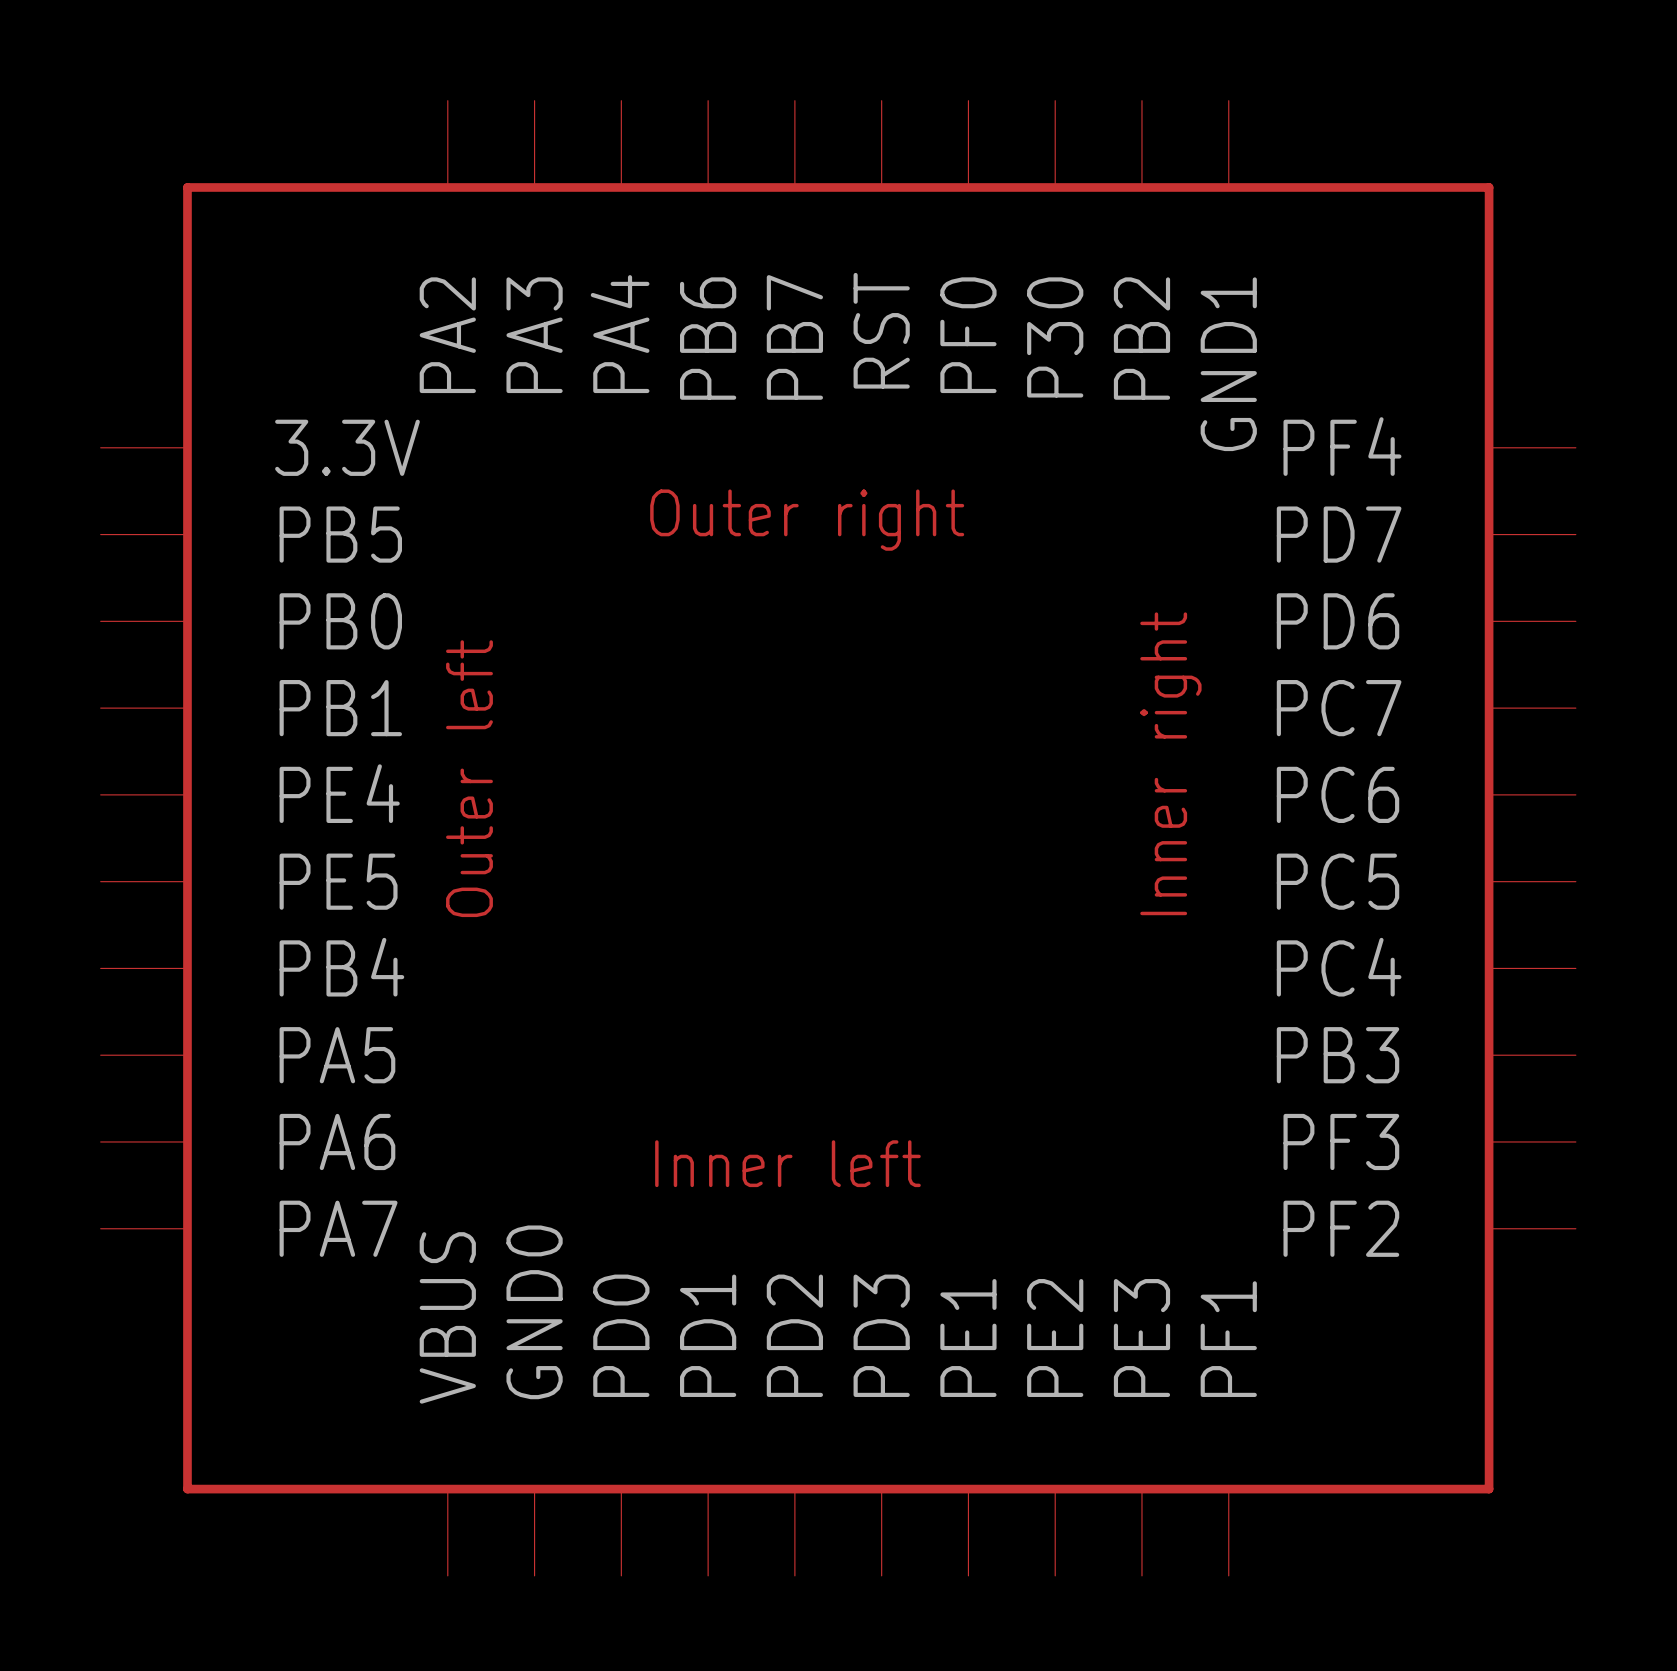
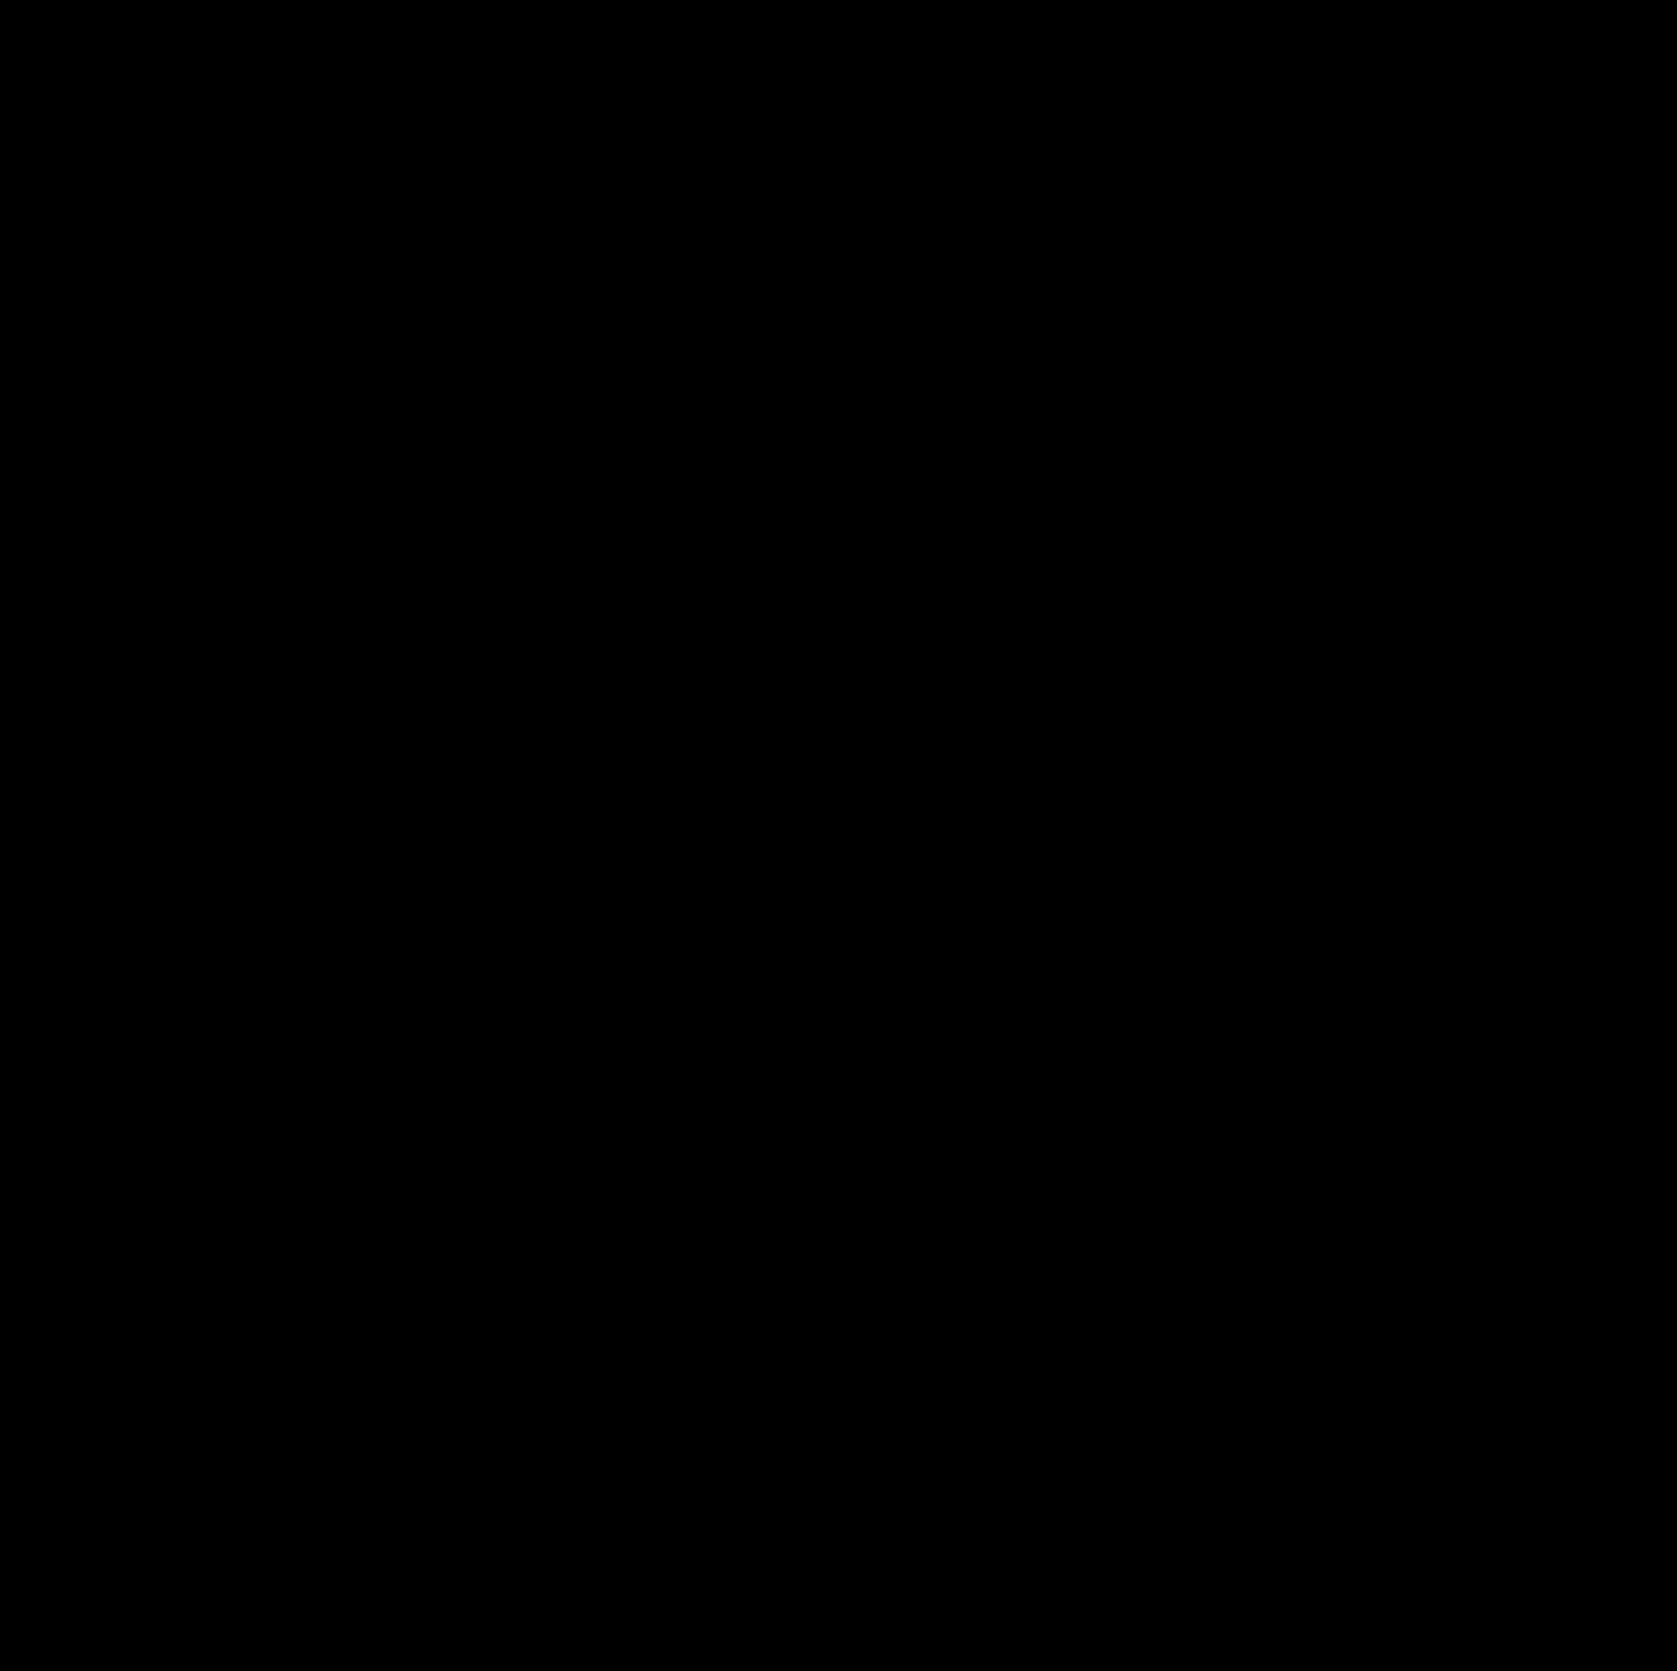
part: (838, 838) -> none

